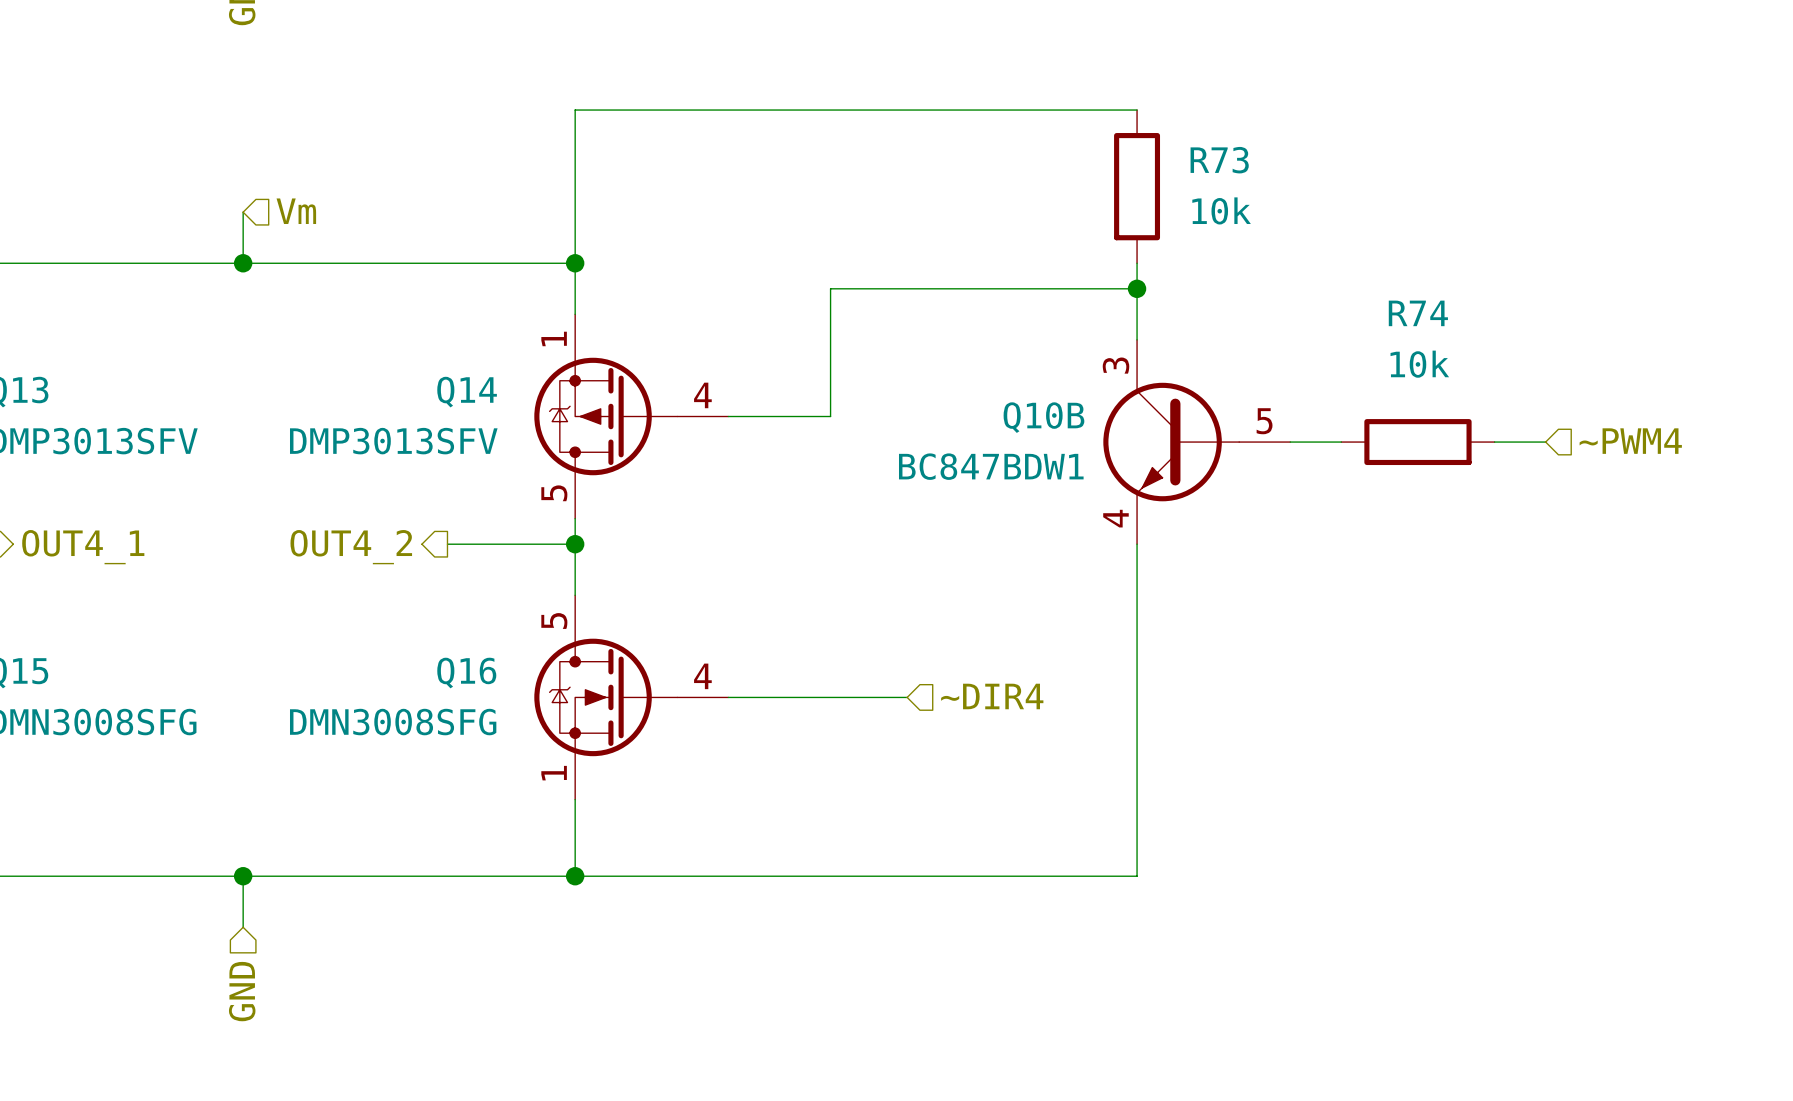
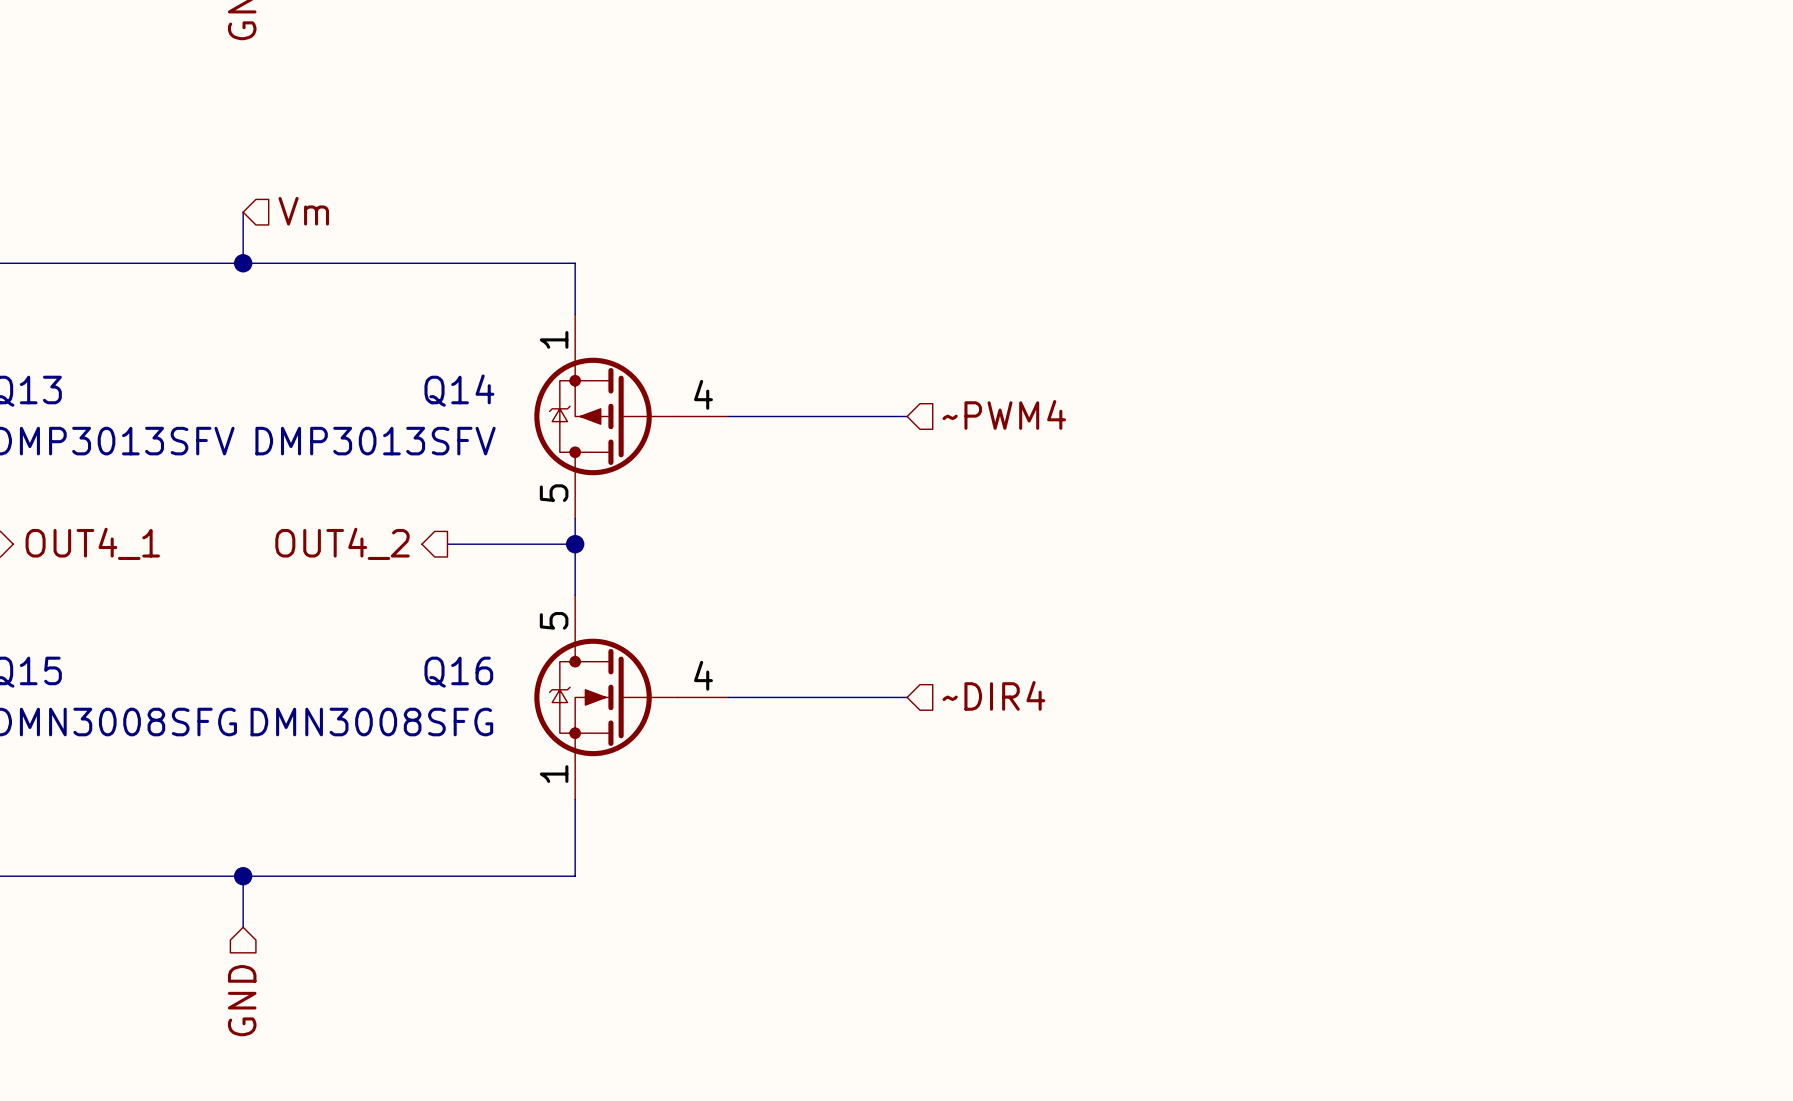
wire: (1137, 110) (575, 110) (575, 263) -> none
R73: 10k (1137, 186) -> none
junction: (575, 263) -> none
wire: (1137, 263) (1137, 339) -> none
wire: (1137, 288) (830, 288) (830, 416) -> (907, 416) (830, 416)
junction: (1137, 288) -> none
hierarchical label: none -> ~PWM4 (1004, 414)
hierarchical label: ~PWM4 (1630, 441) -> none
Q10B: BC847BDW1 (1196, 442) -> none
wire: (1290, 442) (1341, 442) -> none
R74: 10k (1417, 442) -> none
wire: (1494, 442) (1545, 442) -> none
wire: (1137, 544) (1137, 876) (575, 876) -> none
junction: (575, 876) -> none

